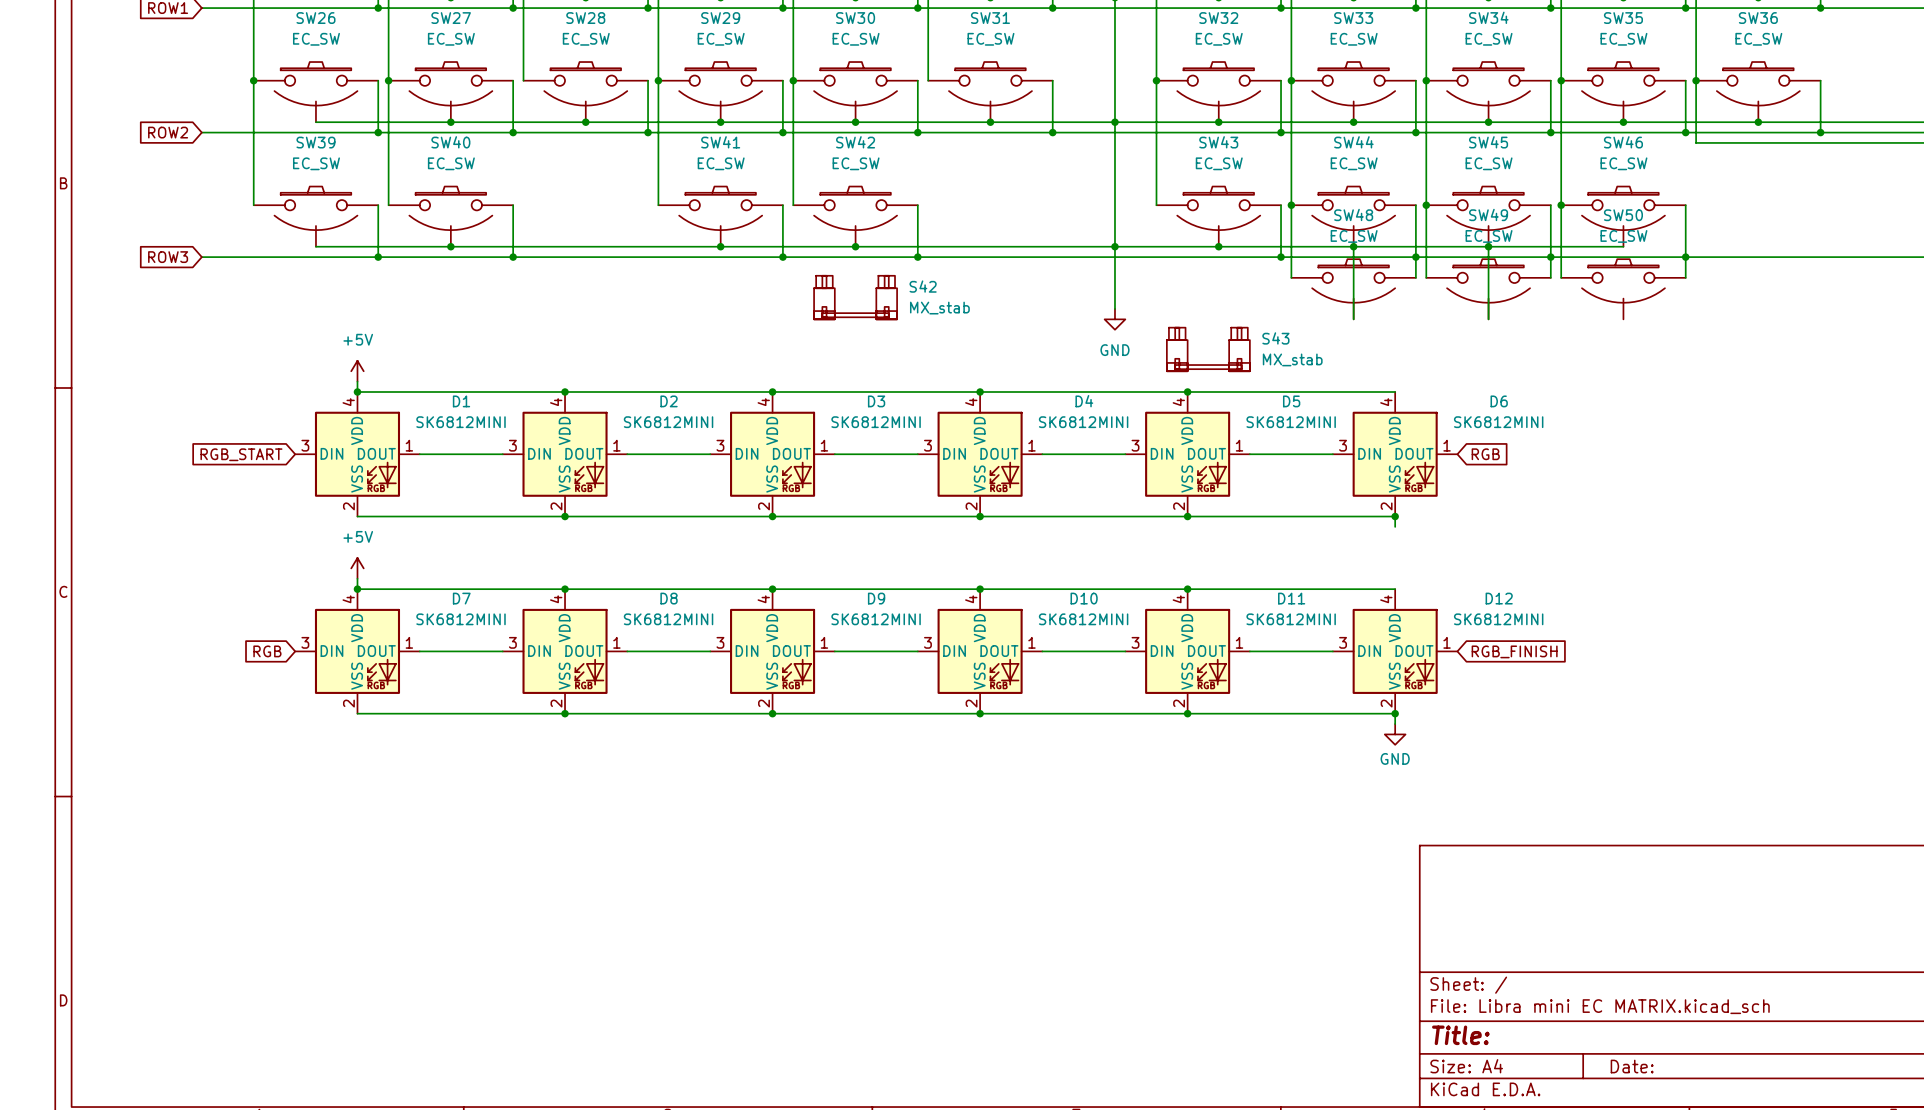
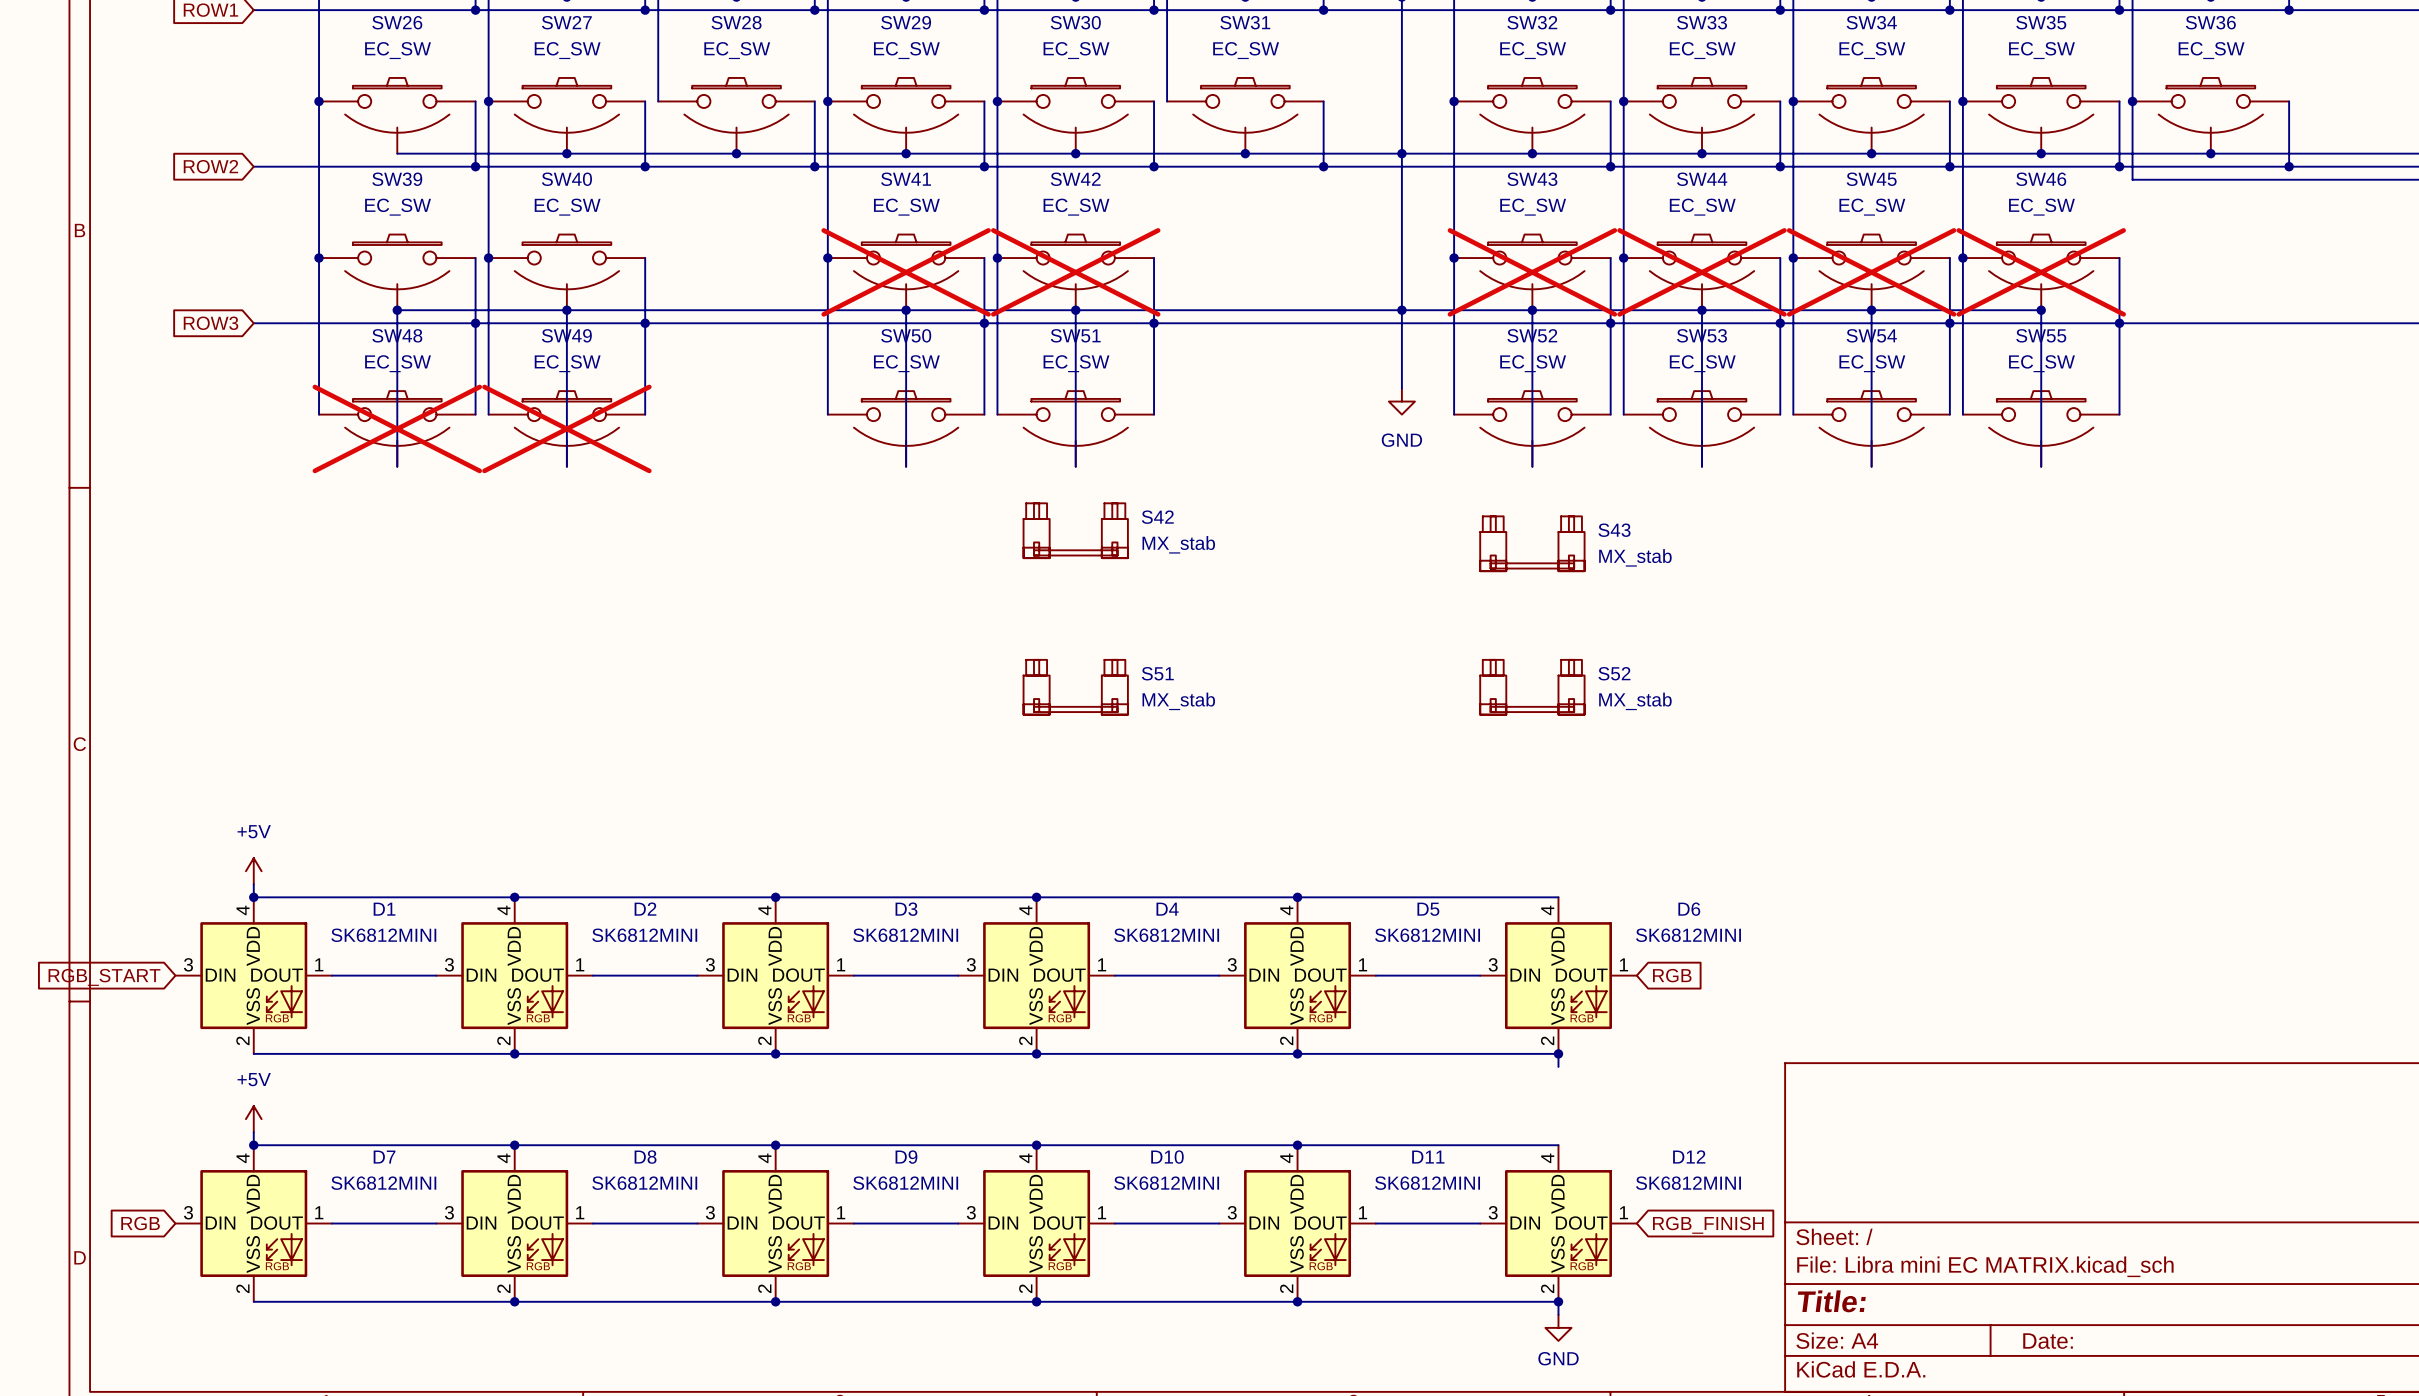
wire: none -> (319, 258) (319, 414)
junction: none -> (319, 258)
wire: none -> (488, 258) (488, 414)
junction: none -> (488, 258)
wire: none -> (827, 258) (827, 414)
junction: none -> (827, 258)
wire: none -> (997, 258) (997, 414)
junction: none -> (997, 258)
wire: none -> (1454, 258) (1454, 414)
junction: none -> (1454, 258)
SW41 do-not-place cross: none -> (906, 272)
SW42 do-not-place cross: none -> (1075, 272)
SW43 do-not-place cross: none -> (1532, 272)
SW44 do-not-place cross: none -> (1702, 272)
SW45 do-not-place cross: none -> (1871, 272)
SW46 do-not-place cross: none -> (2041, 272)
wire: none -> (397, 310) (397, 466)
junction: none -> (397, 310)
wire: none -> (566, 310) (566, 466)
wire: none -> (906, 310) (906, 466)
wire: none -> (1075, 310) (1075, 466)
wire: none -> (1532, 310) (1532, 466)
wire: none -> (2041, 310) (2041, 466)
junction: none -> (2041, 310)
wire: none -> (475, 323) (475, 414)
wire: none -> (645, 323) (645, 414)
wire: none -> (984, 323) (984, 414)
wire: none -> (1154, 323) (1154, 414)
wire: none -> (1610, 323) (1610, 414)
wire: none -> (1623, 349) (1623, 414)
wire: none -> (1780, 349) (1780, 414)
wire: none -> (1793, 349) (1793, 414)
wire: none -> (1949, 349) (1949, 414)
wire: none -> (1962, 349) (1962, 414)
wire: none -> (2119, 349) (2119, 414)
SW48 position: (1353, 289) -> (397, 428)
SW49 position: (1488, 289) -> (566, 428)
SW50 position: (1623, 289) -> (906, 428)
S42 position: (855, 297) -> (1075, 530)
wire: none -> (1702, 401) (1702, 466)
wire: none -> (1871, 401) (1871, 466)
SW48 do-not-place cross: none -> (397, 428)
SW49 do-not-place cross: none -> (566, 428)
SW51: none -> EC_SW (1075, 428)
SW52: none -> EC_SW (1532, 428)
SW53: none -> EC_SW (1702, 428)
SW54: none -> EC_SW (1871, 428)
SW55: none -> EC_SW (2041, 428)
S43 position: (1208, 349) -> (1532, 543)
power symbol: +5V (357, 371) -> none
wire: (357, 381) (357, 392) (1395, 392) -> none
junction: (357, 392) -> none
junction: (565, 392) -> none
junction: (772, 392) -> none
junction: (980, 392) -> none
junction: (1187, 392) -> none
global label: RGB_START (241, 454) -> none
D1 position: (357, 454) -> (253, 975)
wire: (419, 454) (502, 454) -> none
D2 position: (565, 454) -> (514, 975)
wire: (627, 454) (710, 454) -> none
D3 position: (772, 454) -> (775, 975)
wire: (834, 454) (917, 454) -> none
D4 position: (980, 454) -> (1036, 975)
wire: (1042, 454) (1125, 454) -> none
D5 position: (1187, 454) -> (1297, 975)
wire: (1249, 454) (1332, 454) -> none
D6 position: (1395, 454) -> (1558, 975)
global label: RGB (1485, 454) -> none
wire: (357, 516) (1395, 516) (1395, 526) -> none
junction: (565, 516) -> none
junction: (772, 516) -> none
junction: (980, 516) -> none
junction: (1187, 516) -> none
junction: (1395, 516) -> none
S51: none -> MX_stab (1075, 687)
S52: none -> MX_stab (1532, 687)
power symbol: +5V (357, 568) -> none
wire: (357, 578) (357, 589) (1395, 589) -> none
junction: (357, 589) -> none
junction: (565, 589) -> none
junction: (772, 589) -> none
junction: (980, 589) -> none
junction: (1187, 589) -> none
global label: RGB (267, 651) -> none
D7 position: (357, 651) -> (253, 1223)
wire: (419, 651) (502, 651) -> (332, 975) (436, 975)
D8 position: (565, 651) -> (514, 1223)
wire: (627, 651) (710, 651) -> (593, 975) (697, 975)
D9 position: (772, 651) -> (775, 1223)
wire: (834, 651) (917, 651) -> (853, 975) (958, 975)
D10 position: (980, 651) -> (1036, 1223)
wire: (1042, 651) (1125, 651) -> (1114, 975) (1219, 975)
D11 position: (1187, 651) -> (1297, 1223)
wire: (1249, 651) (1332, 651) -> (1375, 975) (1480, 975)
D12 position: (1395, 651) -> (1558, 1223)
global label: RGB_FINISH (1514, 651) -> none
power symbol: none -> +5V (253, 871)
wire: none -> (253, 884) (253, 897) (449, 897)
junction: none -> (253, 897)
junction: none -> (514, 897)
junction: (565, 713) -> none
junction: none -> (775, 897)
junction: (772, 713) -> none
junction: none -> (1036, 897)
junction: (980, 713) -> none
junction: none -> (1297, 897)
junction: (1187, 713) -> none
wire: (1239, 713) (1395, 713) (1395, 724) -> none
junction: (1395, 713) -> none
power symbol: GND (1395, 734) -> none
global label: none -> RGB (1672, 975)
global label: none -> RGB_START (104, 977)
wire: none -> (253, 1053) (1558, 1053) (1558, 1066)
junction: none -> (514, 1053)
junction: none -> (775, 1053)
junction: none -> (1036, 1053)
junction: none -> (1297, 1053)
junction: none -> (1558, 1053)
power symbol: none -> +5V (253, 1119)
wire: none -> (253, 1132) (253, 1145) (1558, 1145)
junction: none -> (253, 1145)
junction: none -> (514, 1145)
junction: none -> (775, 1145)
junction: none -> (1036, 1145)
junction: none -> (1297, 1145)
global label: none -> RGB (140, 1223)
wire: none -> (332, 1223) (436, 1223)
wire: none -> (593, 1223) (697, 1223)
wire: none -> (853, 1223) (958, 1223)
wire: none -> (1114, 1223) (1219, 1223)
wire: none -> (1375, 1223) (1480, 1223)
global label: none -> RGB_FINISH (1708, 1225)
wire: none -> (253, 1301) (1558, 1301) (1558, 1314)
junction: none -> (514, 1301)
junction: none -> (775, 1301)
junction: none -> (1036, 1301)
junction: none -> (1297, 1301)
junction: none -> (1558, 1301)
power symbol: none -> GND (1558, 1327)

